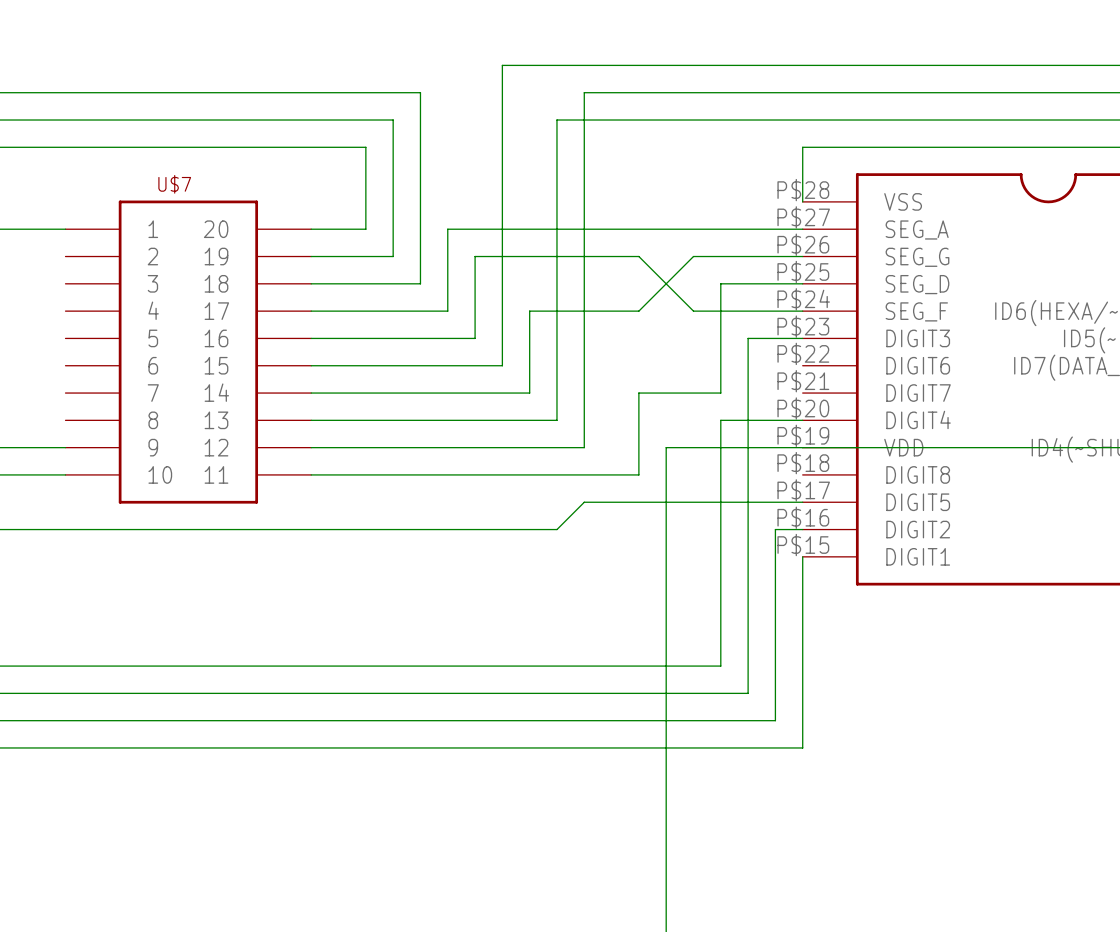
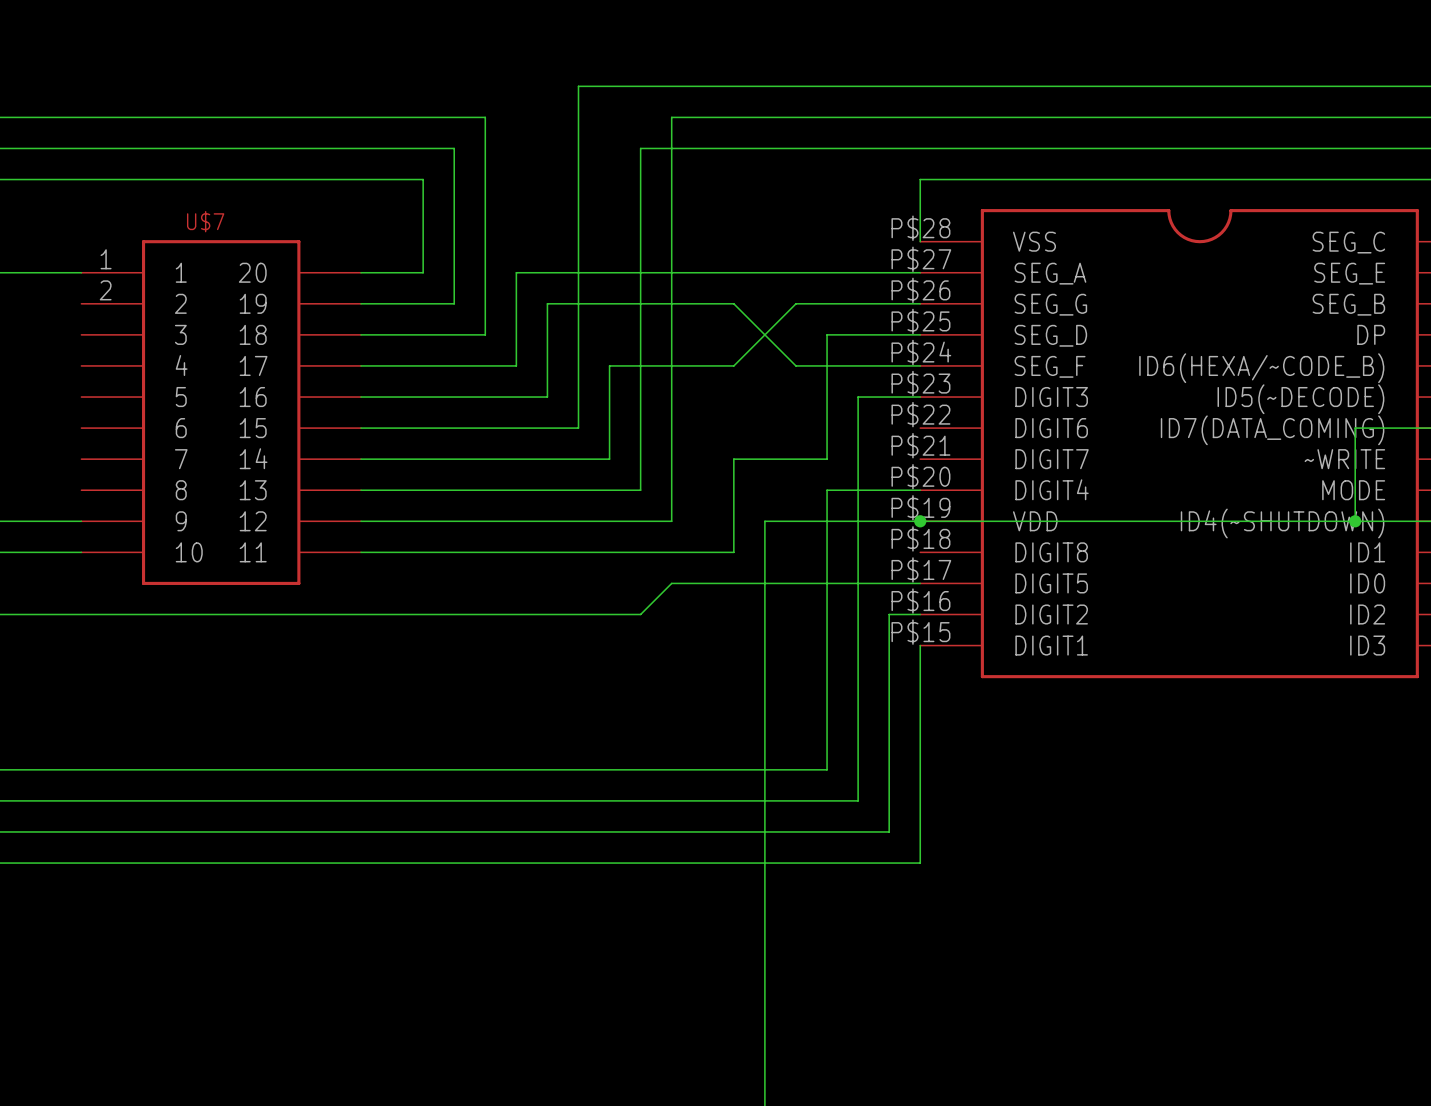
U$7 pin number: none -> 1 (106, 259)
U$7 pin number: none -> 2 (105, 290)
junction: none -> (920, 521)

